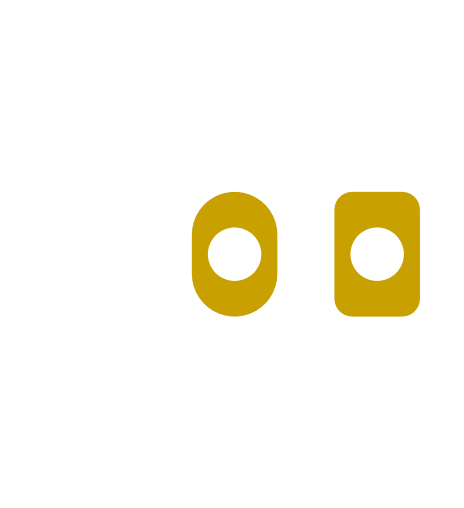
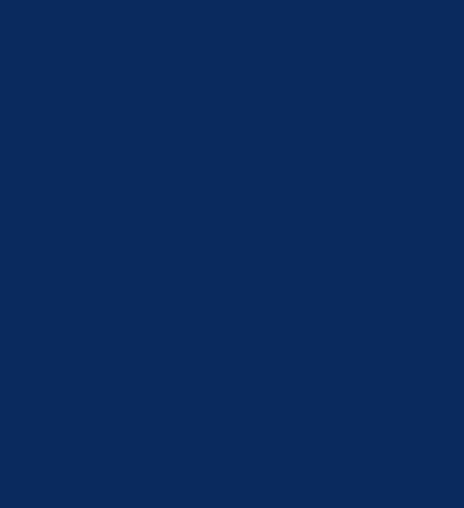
part: (305, 254) -> none

